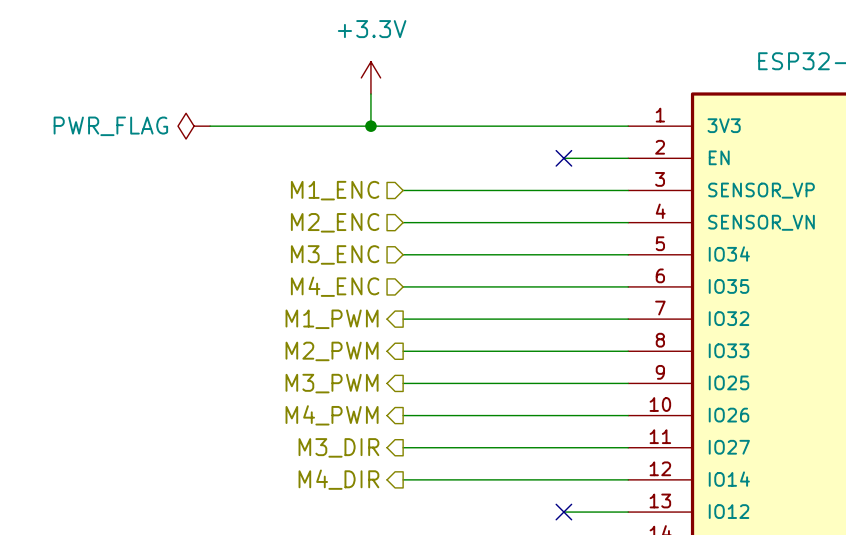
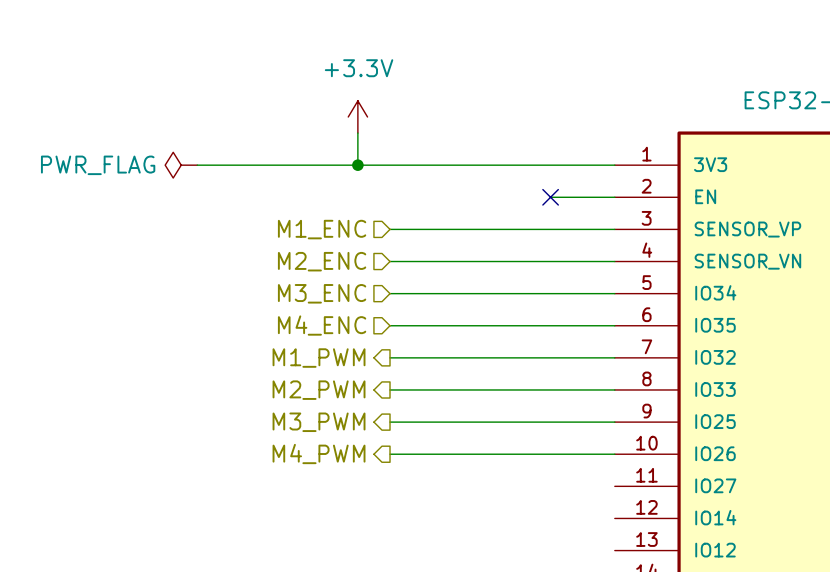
hierarchical label: M3_DIR (338, 447) -> none
wire: (403, 447) (628, 447) -> none
hierarchical label: M4_DIR (338, 479) -> none
wire: (403, 479) (628, 479) -> none
wire: (563, 512) (628, 512) -> none
no-connect mark: (563, 512) -> none

